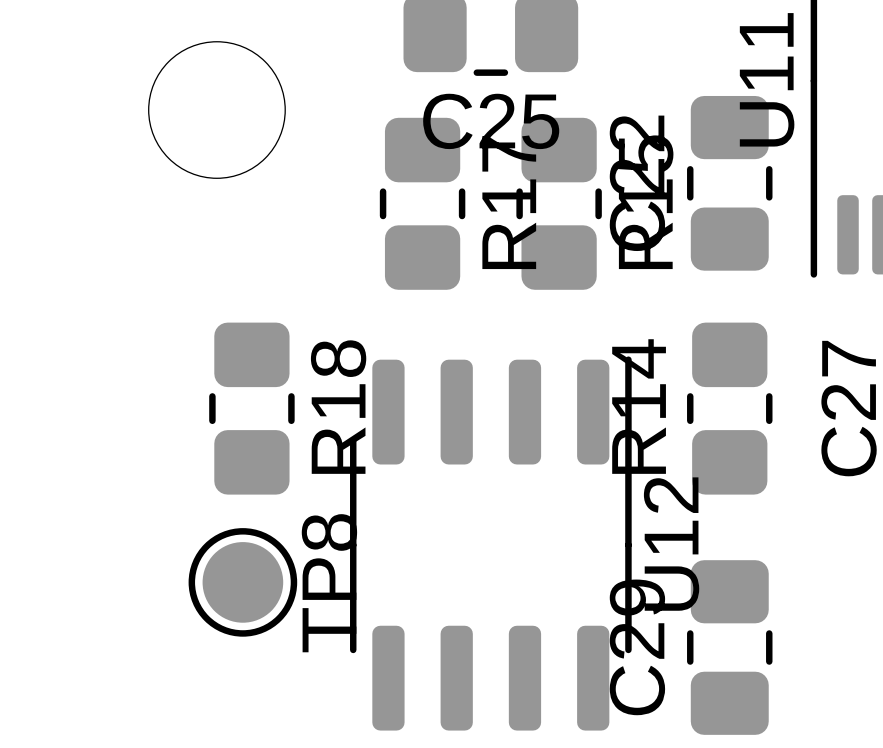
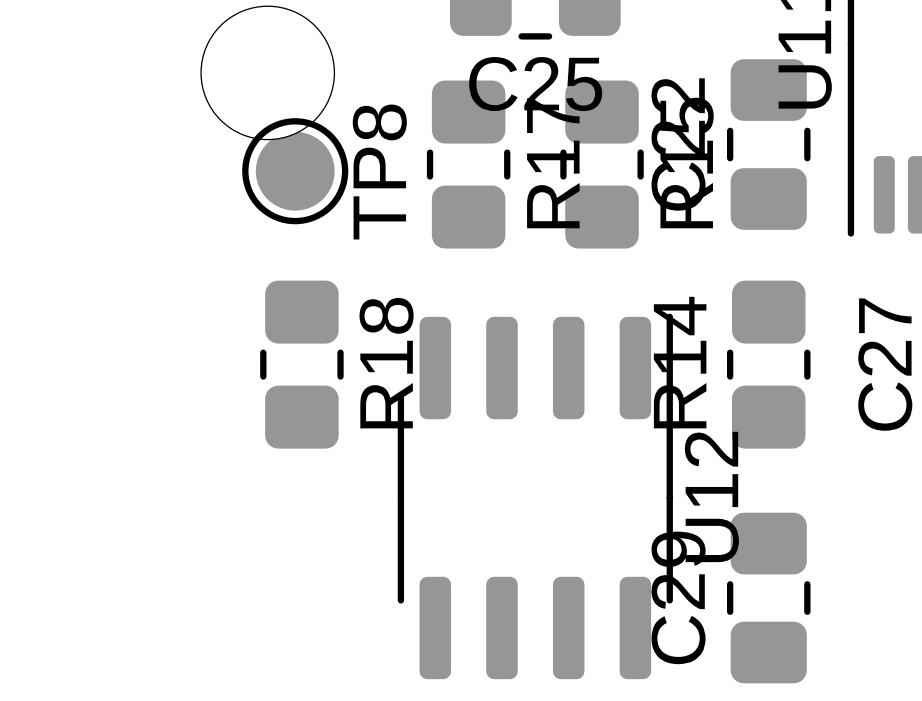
TP8 position: (242, 582) -> (295, 171)

